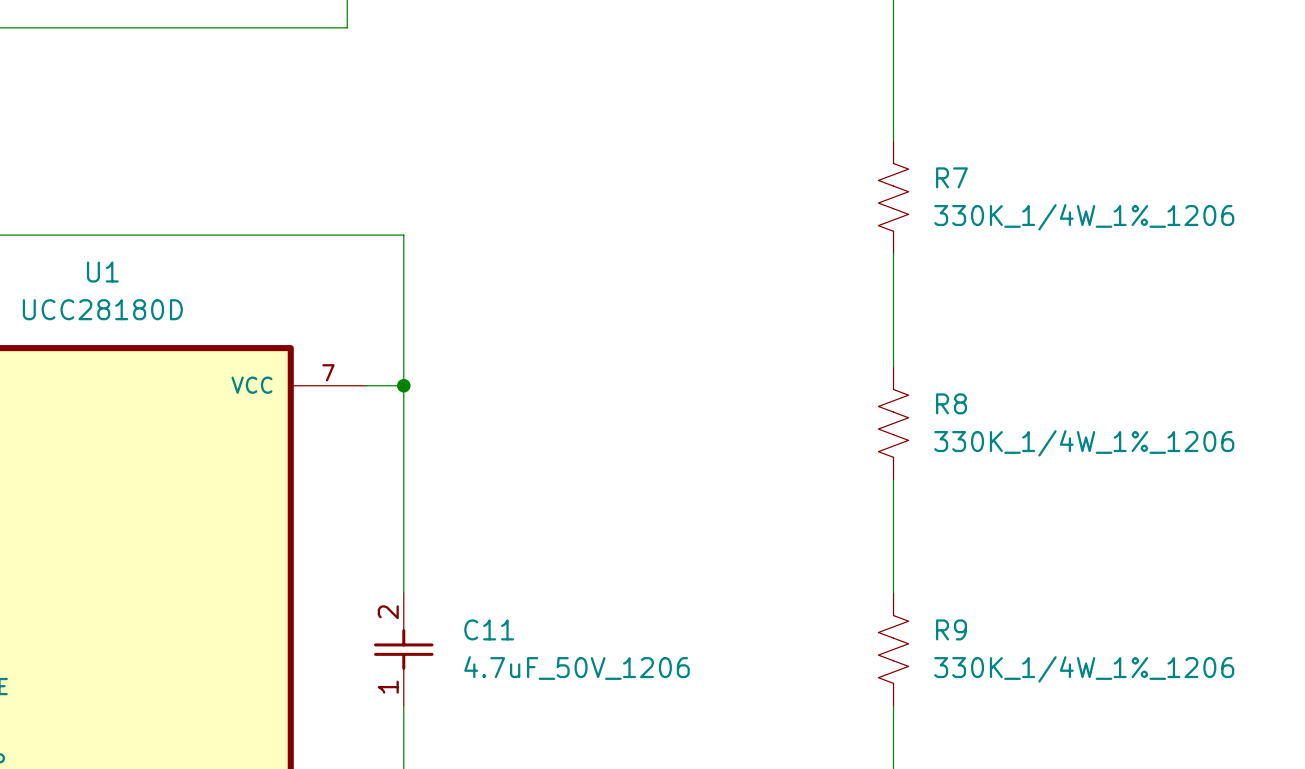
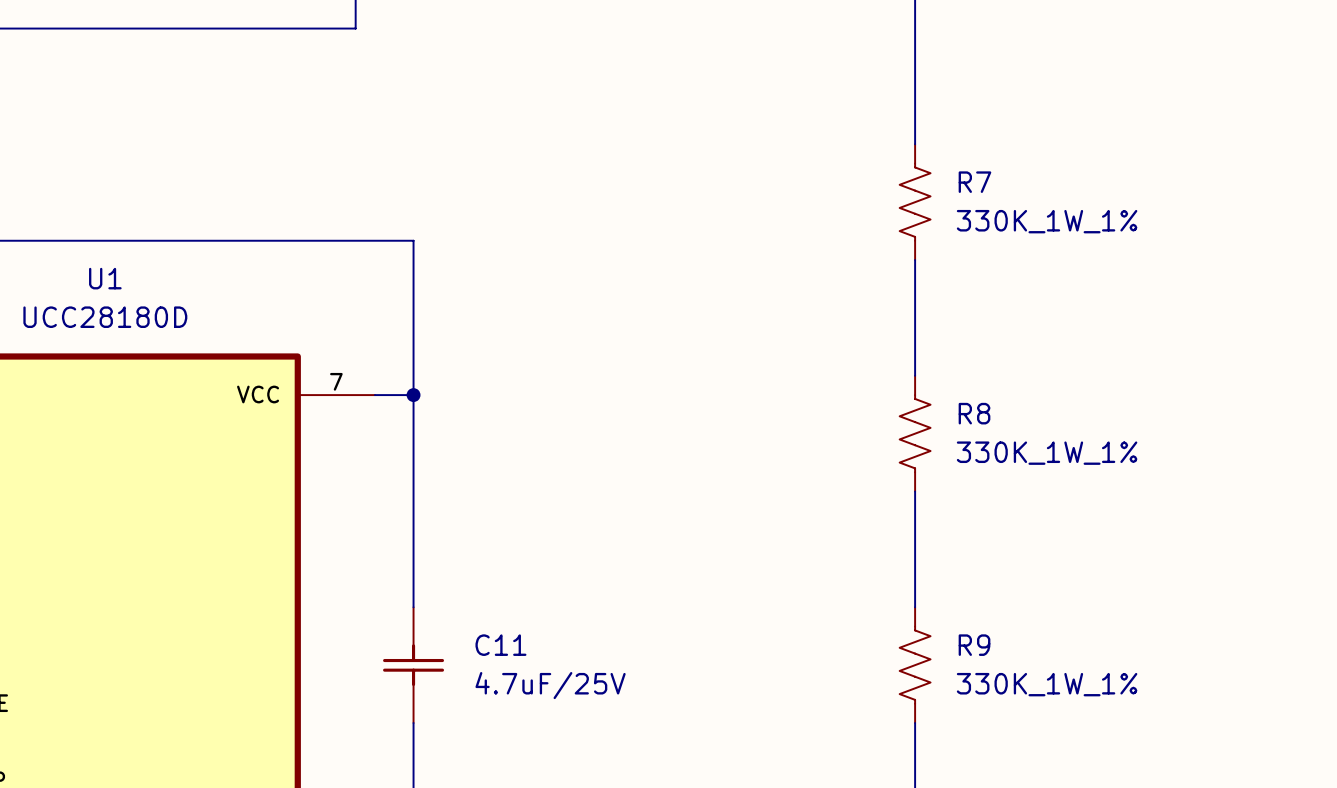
R7 value: 330K_1/4W_1%_1206 (1084, 217) -> 330K_1W_1% (1047, 221)
R8 value: 330K_1/4W_1%_1206 (1084, 443) -> 330K_1W_1% (1047, 453)
C11 pin number: 2 (388, 612) -> none
C11 value: 4.7uF_50V_1206 (577, 668) -> 4.7uF/25V (550, 685)
R9 value: 330K_1/4W_1%_1206 (1084, 669) -> 330K_1W_1% (1047, 684)
C11 pin number: 1 (388, 687) -> none

